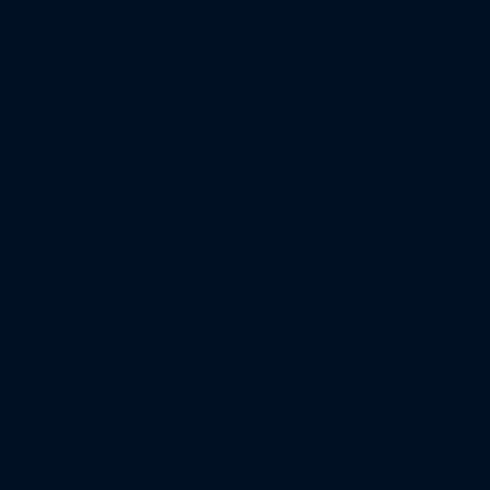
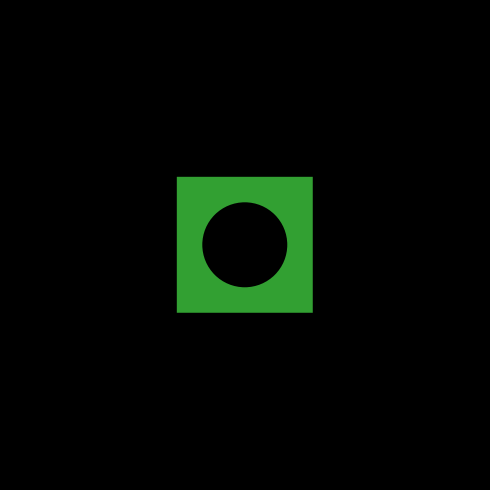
part: none -> (244, 244)

